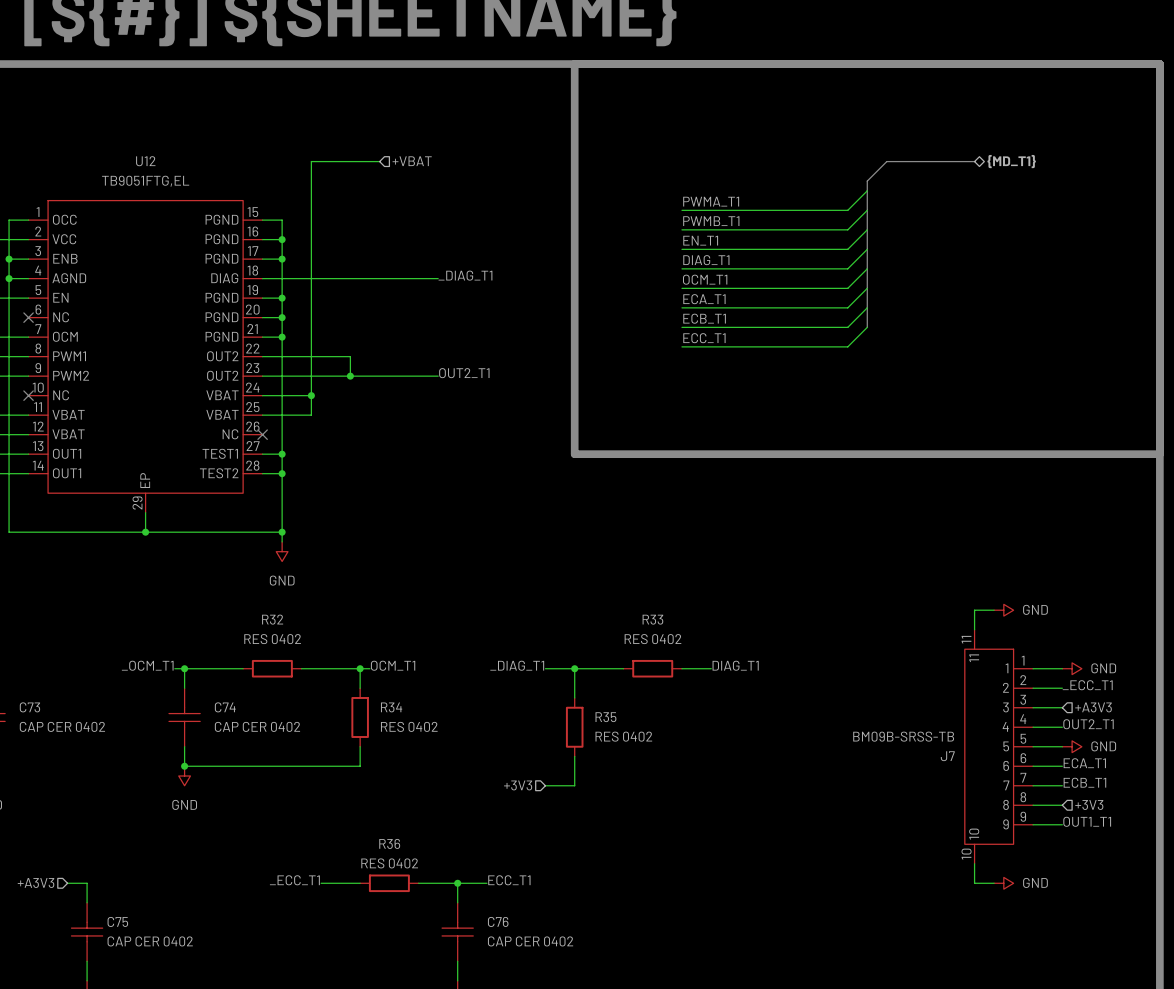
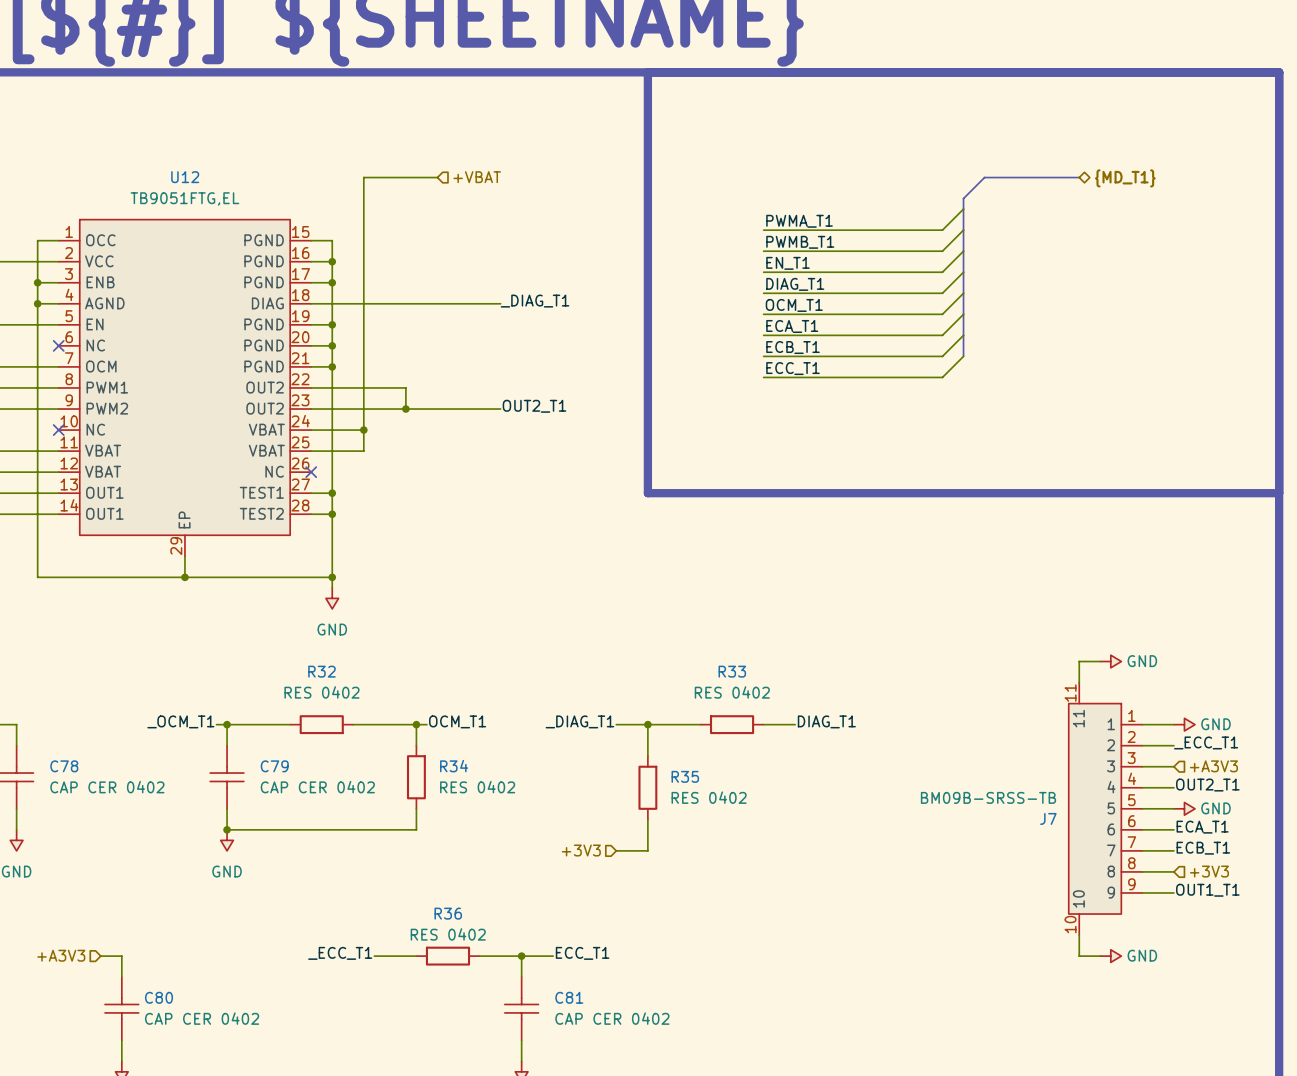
C73 name: C73 (29, 707) -> C78 (64, 766)
C74 name: C74 (225, 707) -> C79 (274, 766)
C75 name: C75 (117, 921) -> C80 (158, 997)
C76 name: C76 (498, 921) -> C81 (569, 997)

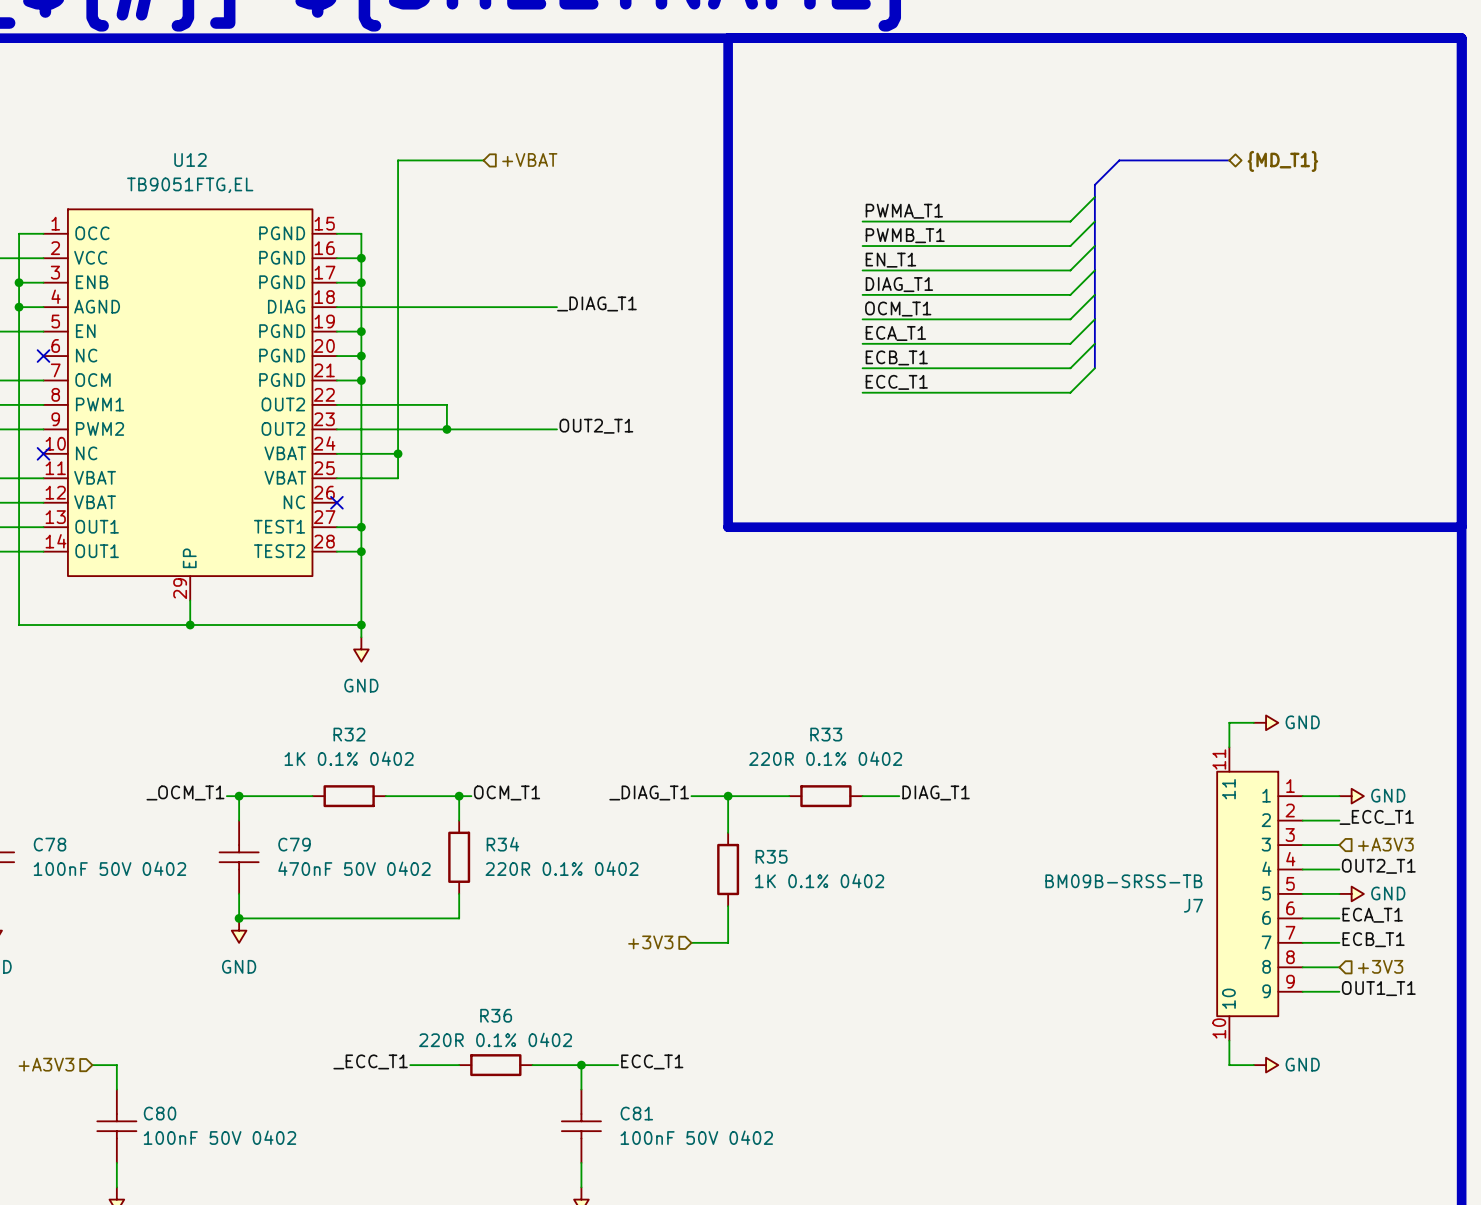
R32 value: RES 0402 (321, 692) -> 1K 0.1% 0402 (349, 758)
R33 value: RES 0402 (732, 692) -> 220R 0.1% 0402 (825, 758)
C78 value: CAP CER 0402 (107, 787) -> 100nF 50V 0402 (109, 868)
C79 value: CAP CER 0402 (317, 787) -> 470nF 50V 0402 (354, 868)
R34 value: RES 0402 (477, 787) -> 220R 0.1% 0402 (562, 868)
R35 value: RES 0402 (709, 797) -> 1K 0.1% 0402 (819, 880)
R36 value: RES 0402 (448, 934) -> 220R 0.1% 0402 (495, 1039)
C80 value: CAP CER 0402 (202, 1018) -> 100nF 50V 0402 (219, 1137)
C81 value: CAP CER 0402 (612, 1018) -> 100nF 50V 0402 (696, 1137)

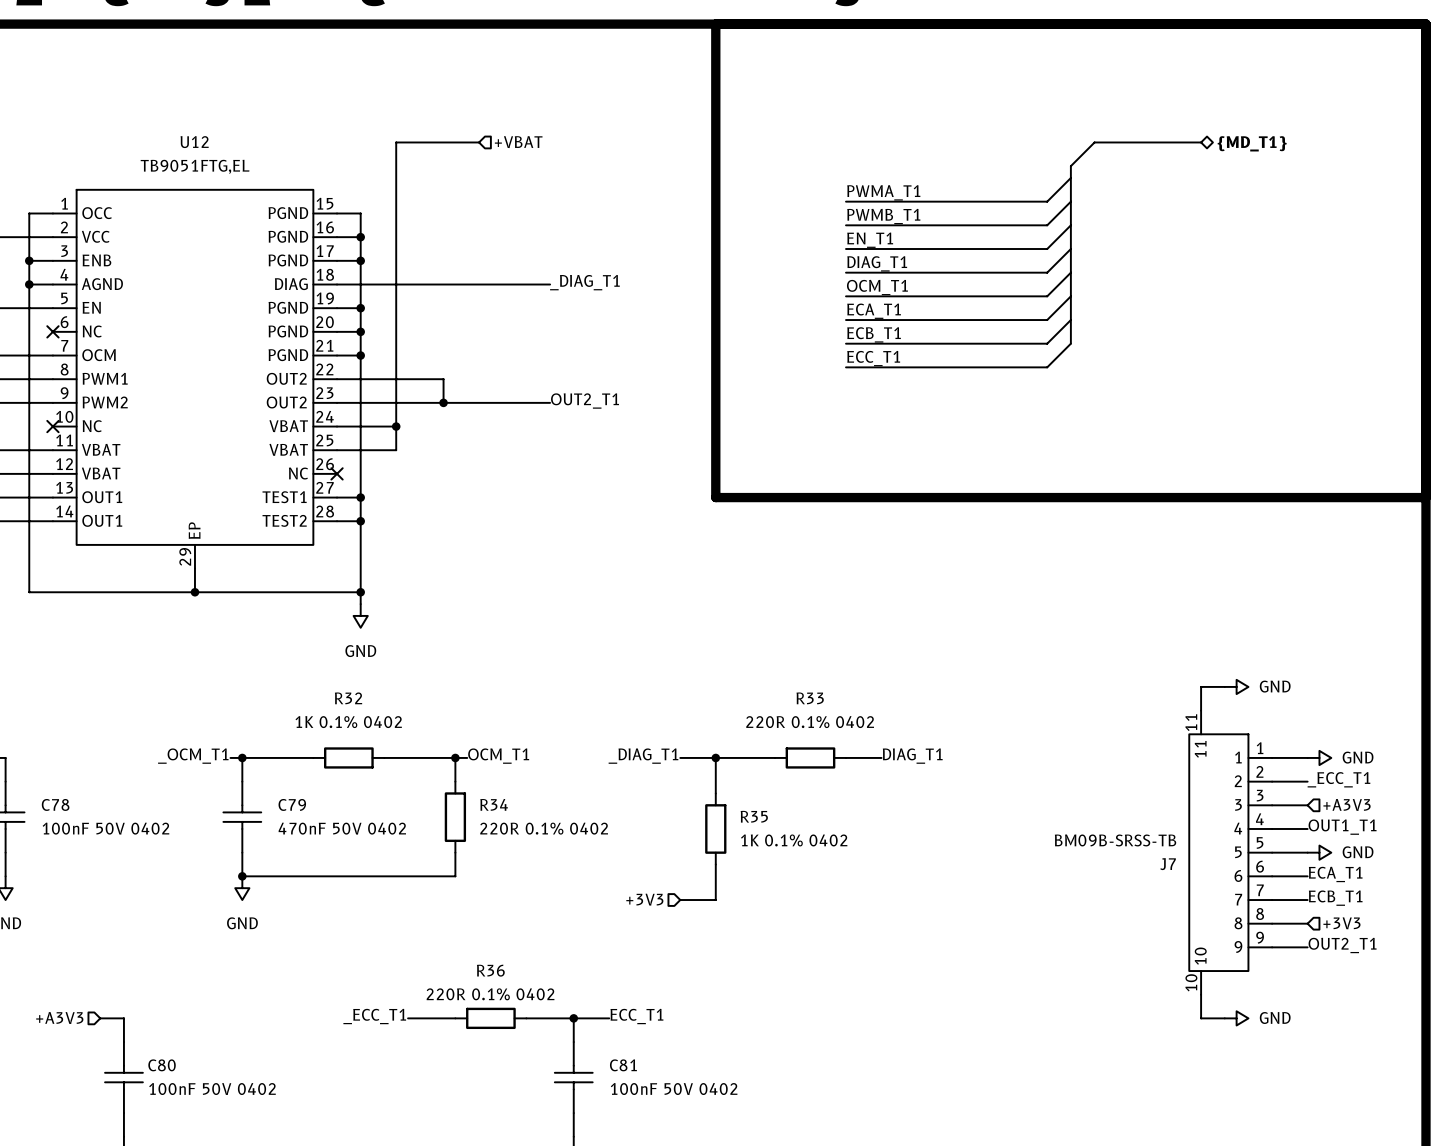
label: OUT2_T1 (1378, 866) -> OUT1_T1 (1342, 827)
label: OUT1_T1 (1378, 988) -> OUT2_T1 (1342, 945)

